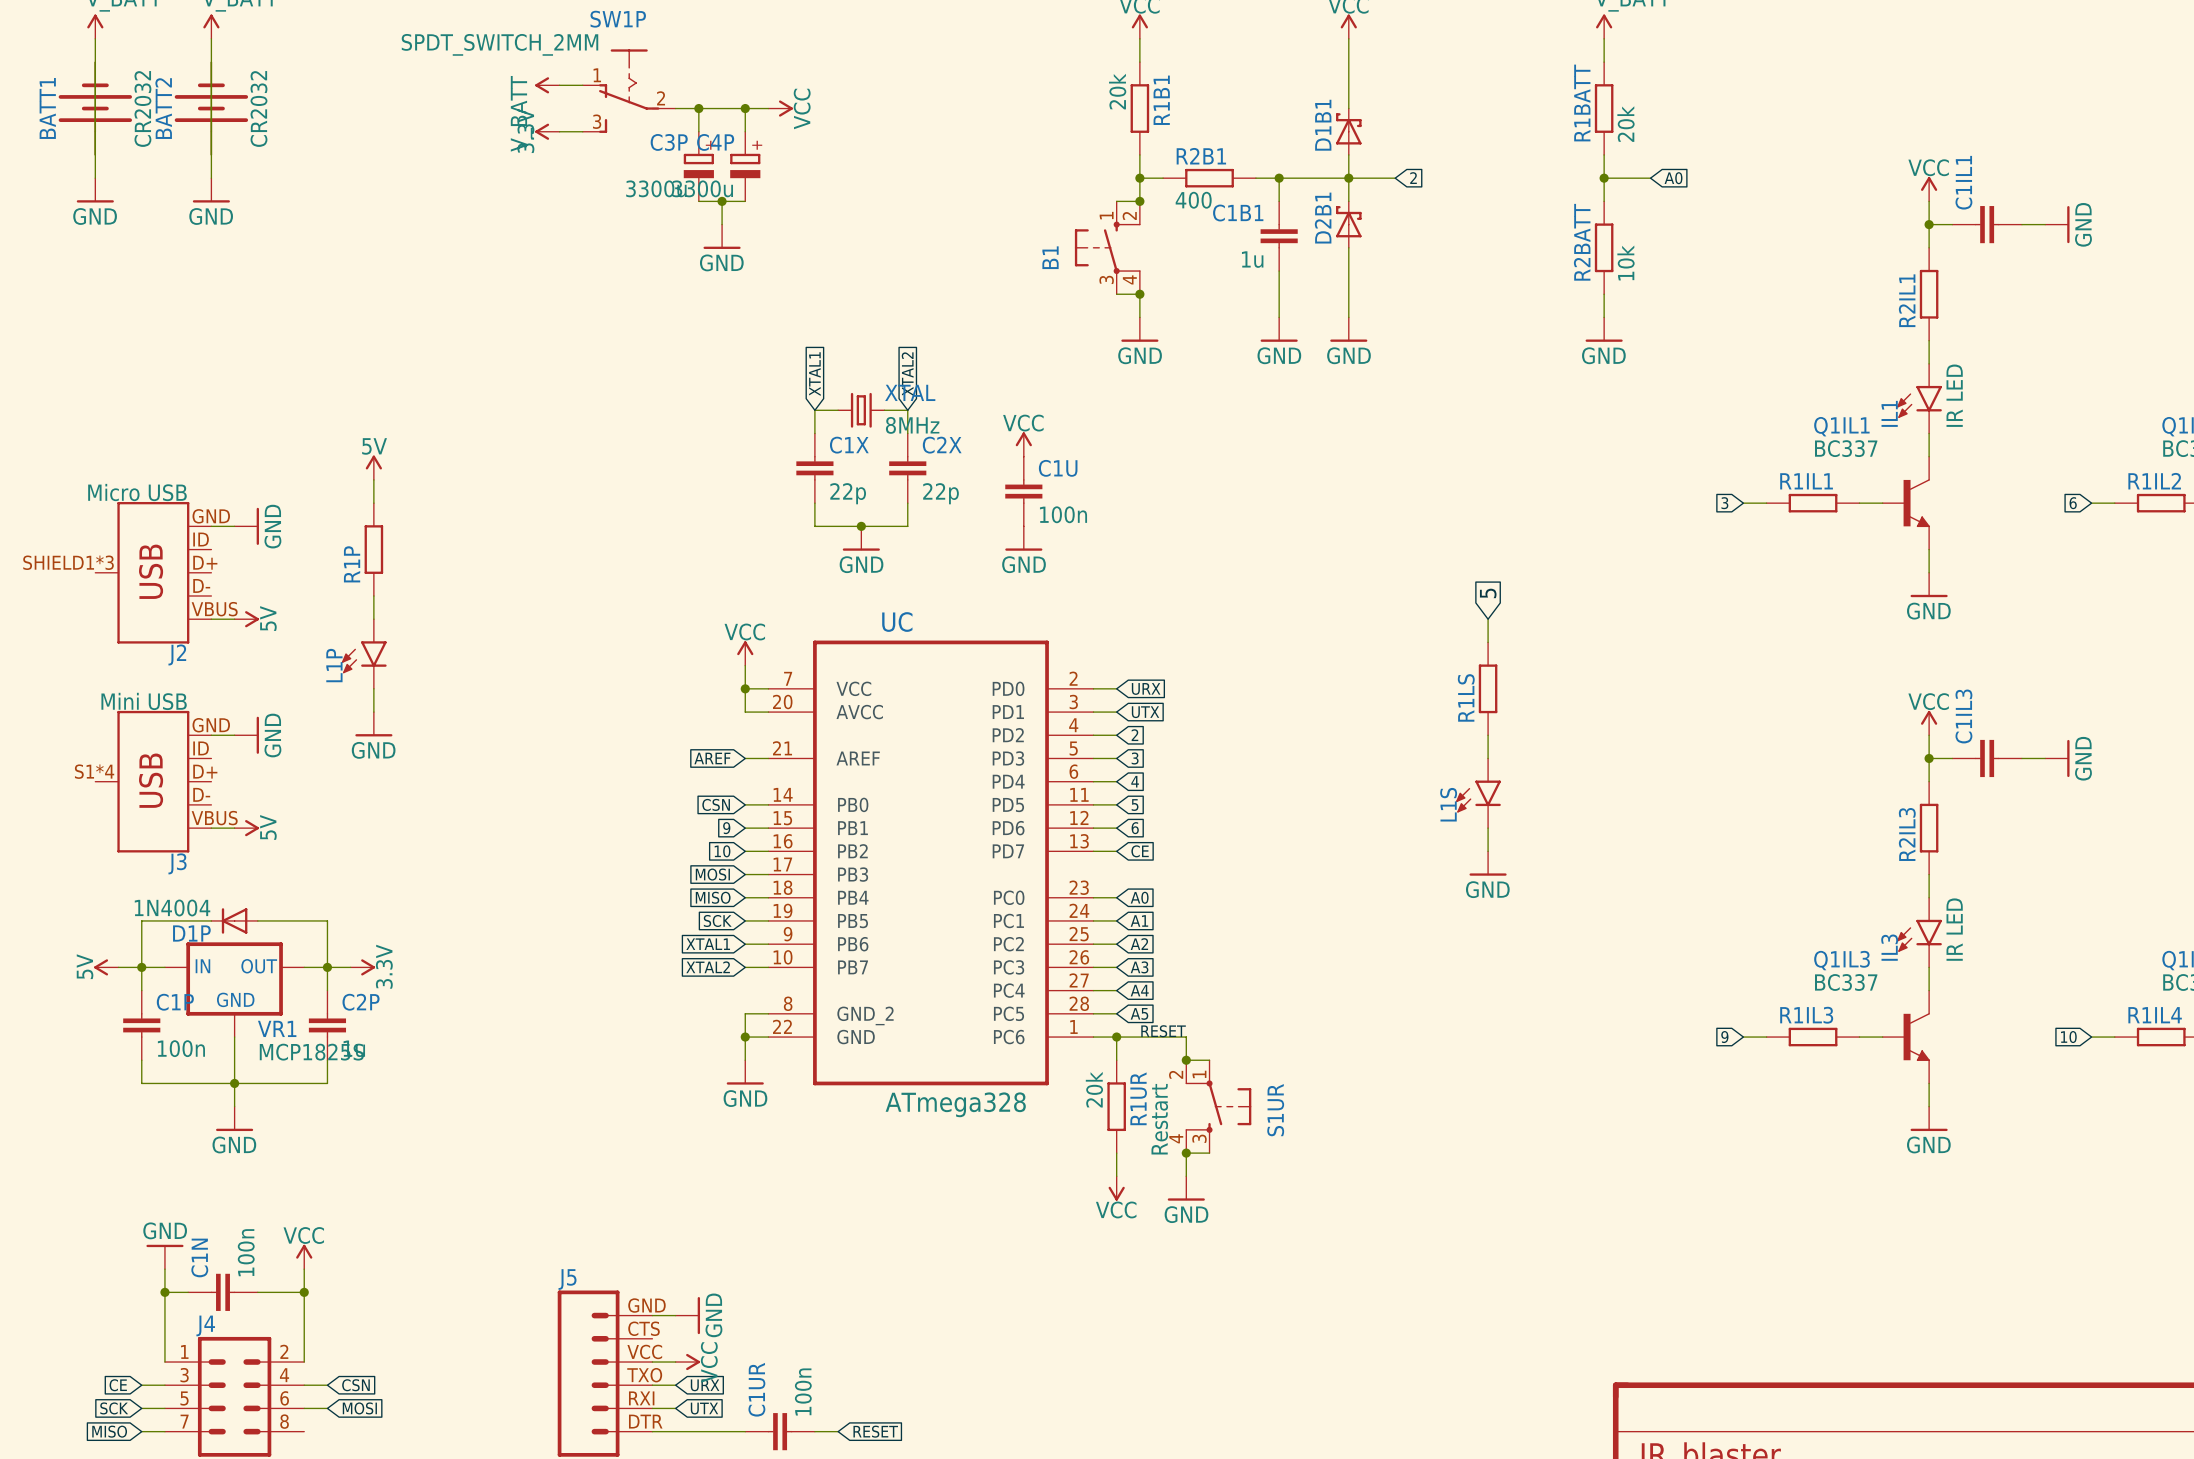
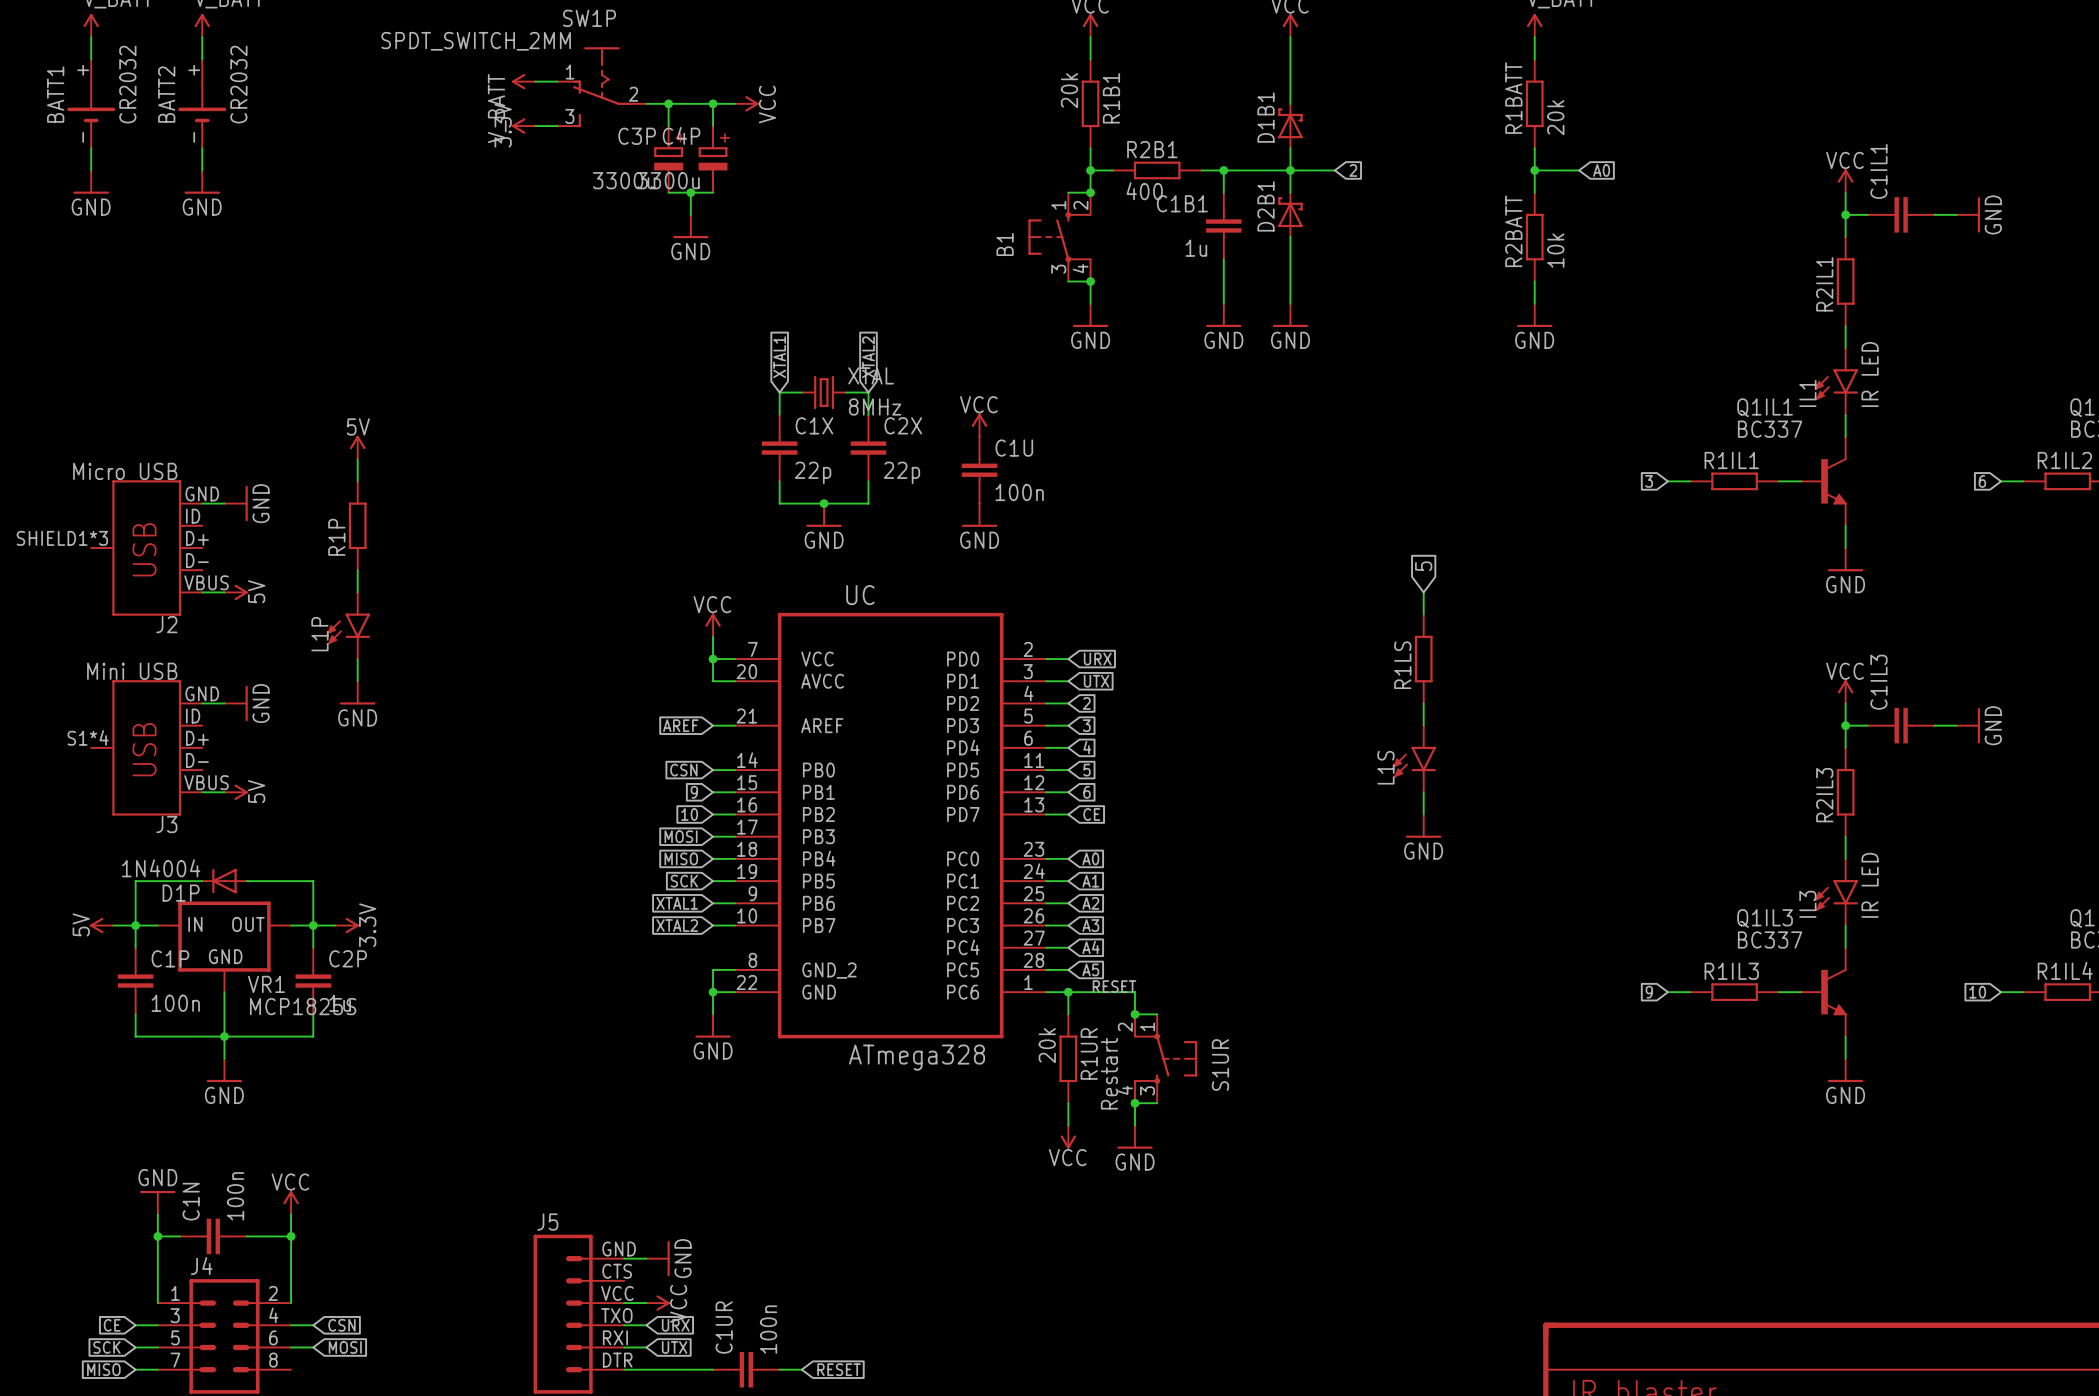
BATT1 symbol: [58, 62, 133, 155] -> [67, 59, 116, 149]
BATT2 symbol: [174, 62, 249, 155] -> [178, 59, 227, 149]
BATT1 value position: CR2032 (142, 108) -> CR2032 (127, 84)
BATT2 value position: CR2032 (258, 108) -> CR2032 (238, 84)

